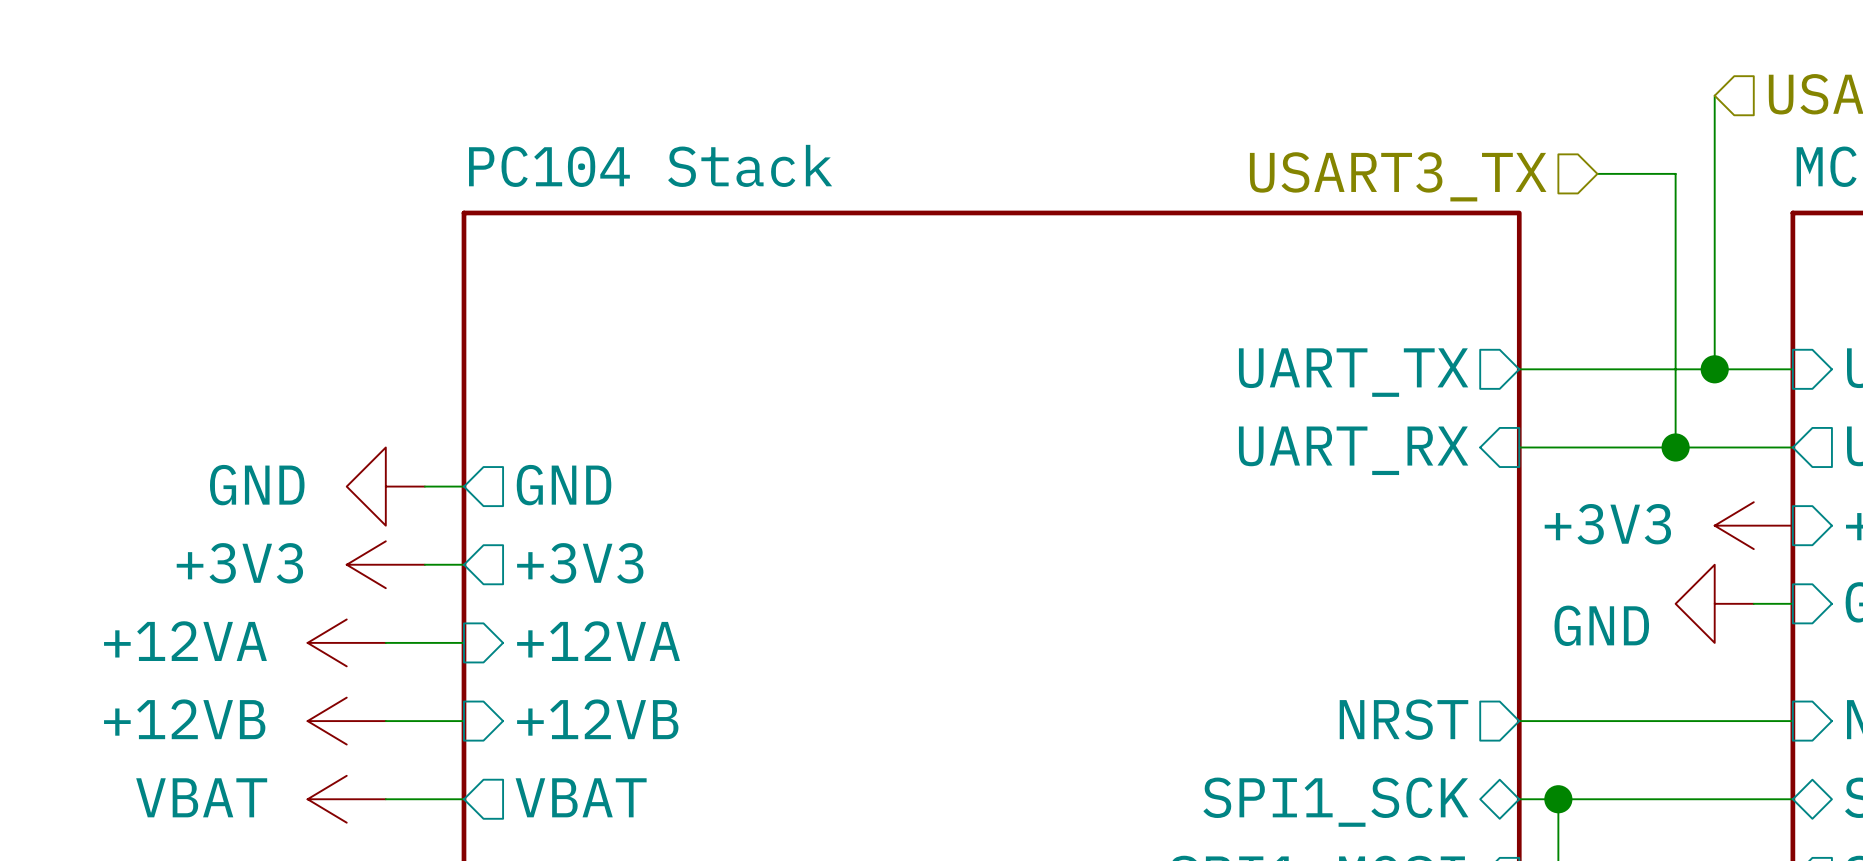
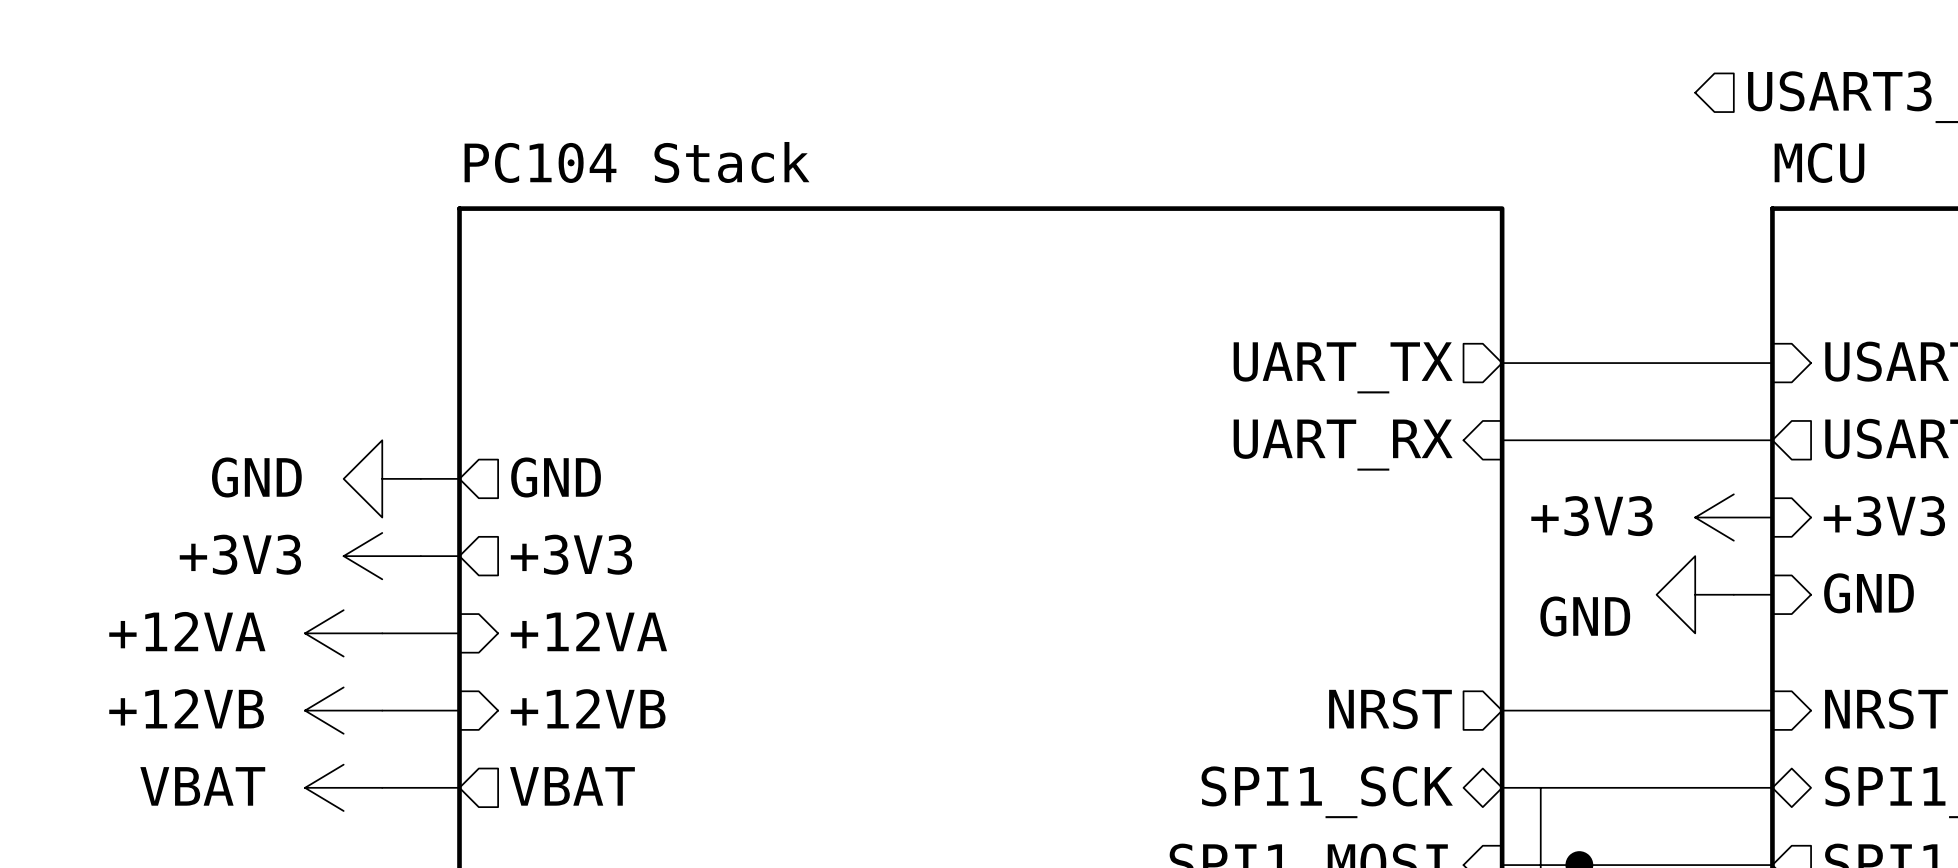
wire: (1714, 95) (1714, 369) -> none
wire: (1597, 173) (1675, 173) (1675, 447) -> none
hierarchical label: USART3_TX (1398, 176) -> none
junction: (1714, 369) -> none
junction: (1675, 447) -> none
junction: (1558, 799) -> none

